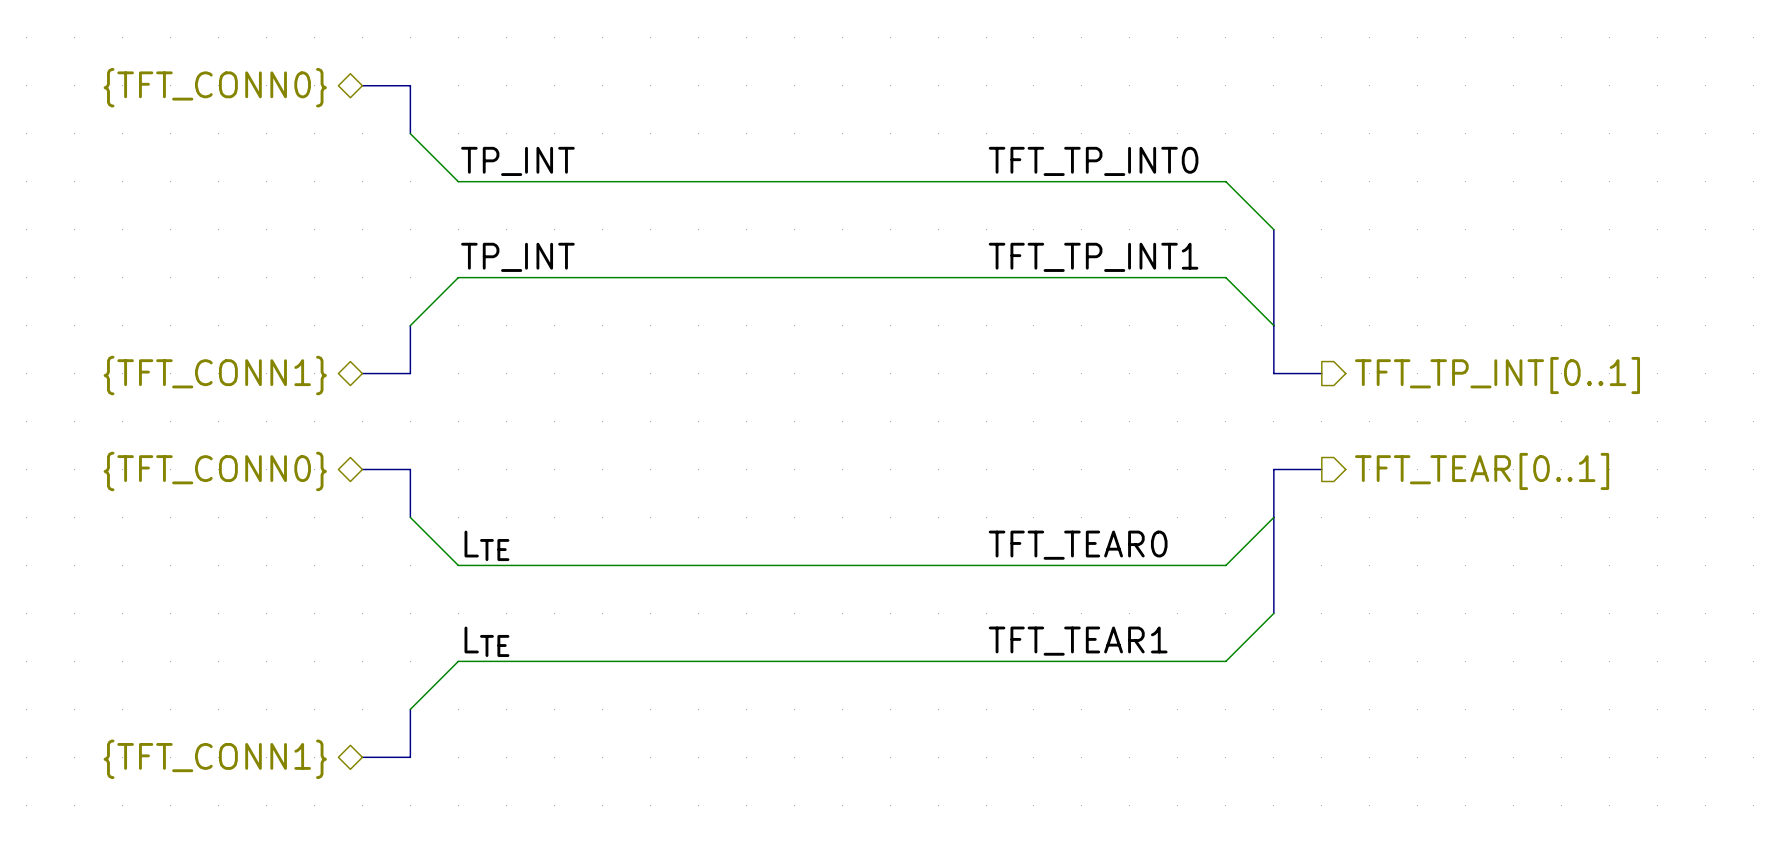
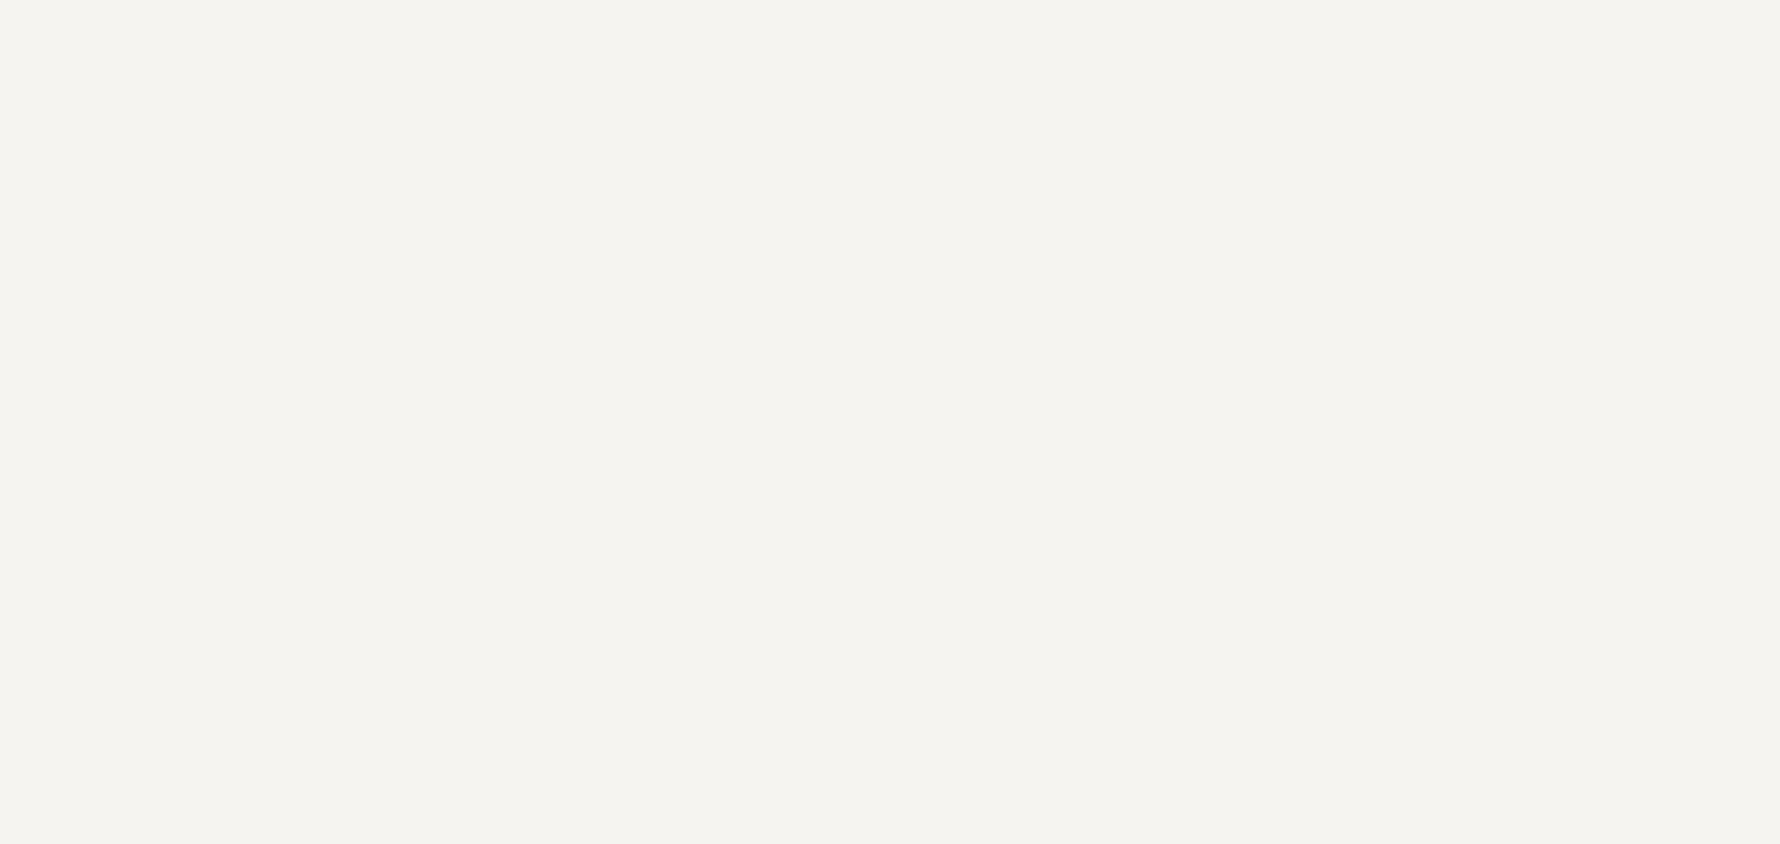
bus: (362, 85) (410, 85) (410, 133) -> none
hierarchical label: {TFT_CONN0} (215, 87) -> none
wire: (410, 133) (458, 181) (1225, 181) (1273, 229) -> none
label: TP_INT (517, 161) -> none
label: TFT_TP_INT0 (1093, 161) -> none
bus: (1273, 229) (1273, 373) (1321, 373) -> none
label: TP_INT (517, 257) -> none
label: TFT_TP_INT1 (1093, 257) -> none
wire: (410, 325) (458, 277) (1225, 277) (1273, 325) -> none
bus: (410, 325) (410, 373) (362, 373) -> none
hierarchical label: {TFT_CONN1} (215, 375) -> none
hierarchical label: TFT_TP_INT[0..1] (1497, 375) -> none
bus: (362, 469) (410, 469) (410, 517) -> none
bus: (1321, 469) (1273, 469) (1273, 613) -> none
hierarchical label: {TFT_CONN0} (215, 471) -> none
hierarchical label: TFT_TEAR[0..1] (1482, 471) -> none
wire: (410, 517) (458, 565) (1225, 565) (1273, 517) -> none
label: LTE (486, 545) -> none
label: TFT_TEAR0 (1078, 545) -> none
wire: (1273, 613) (1225, 661) (458, 661) (410, 709) -> none
label: LTE (486, 641) -> none
label: TFT_TEAR1 (1078, 641) -> none
bus: (410, 709) (410, 757) (362, 757) -> none
hierarchical label: {TFT_CONN1} (215, 759) -> none

